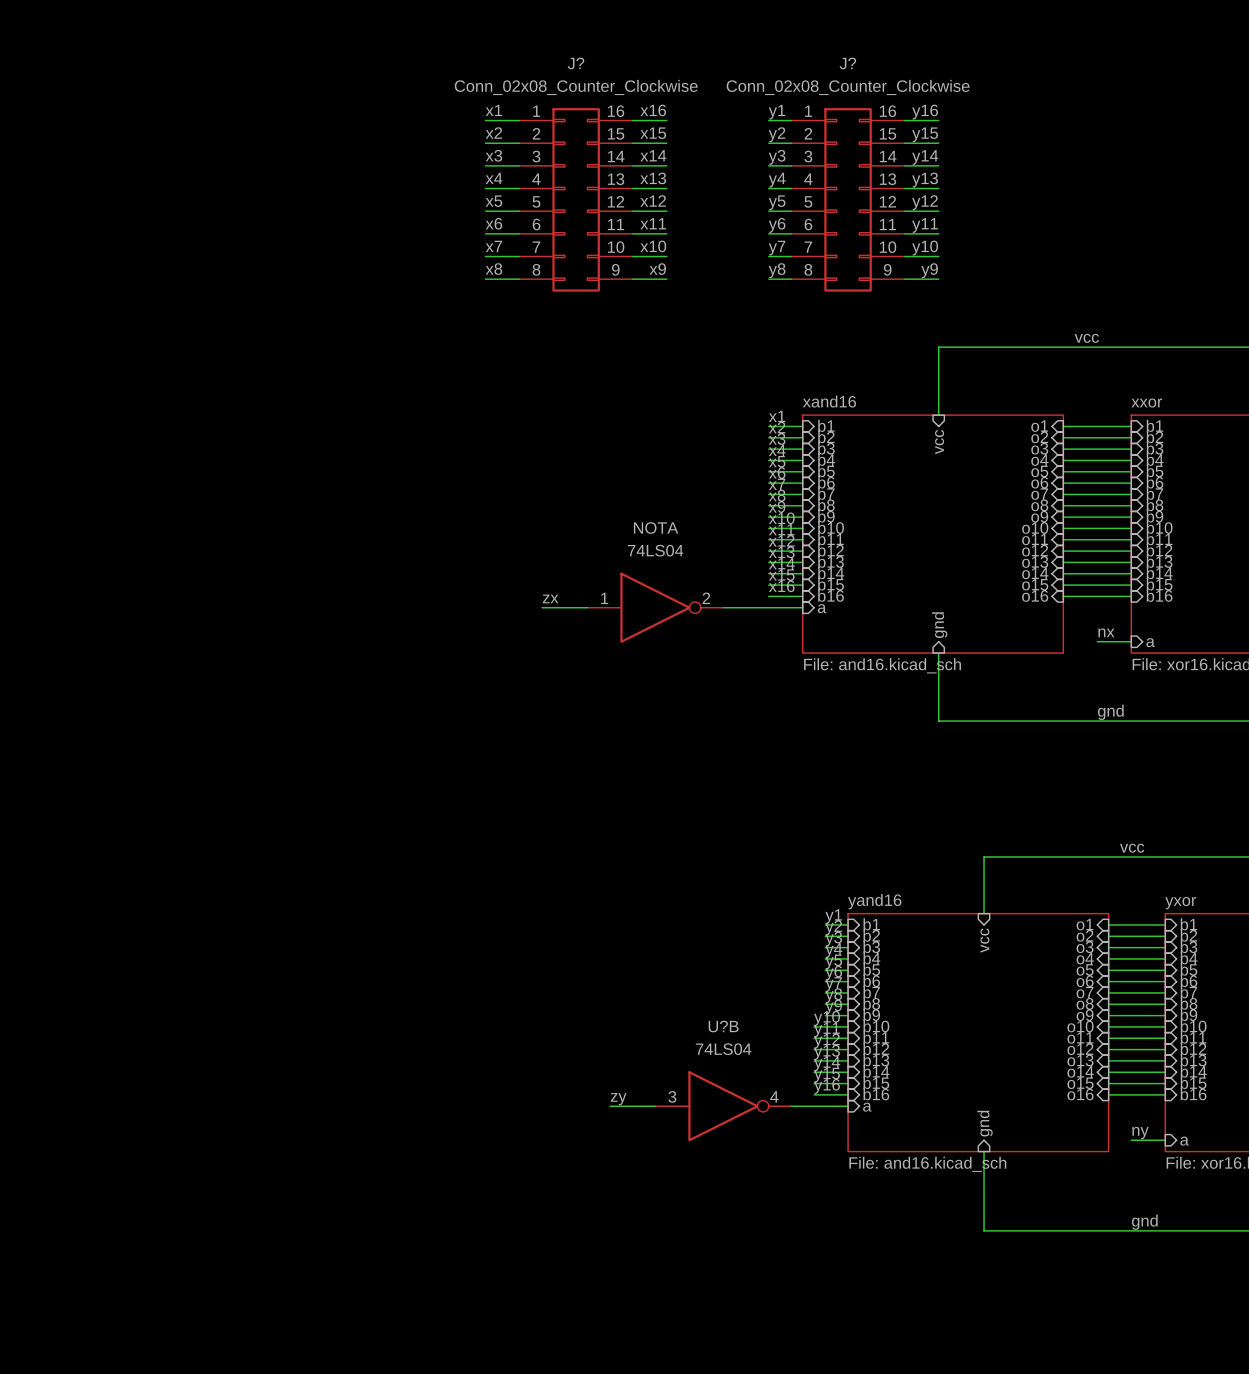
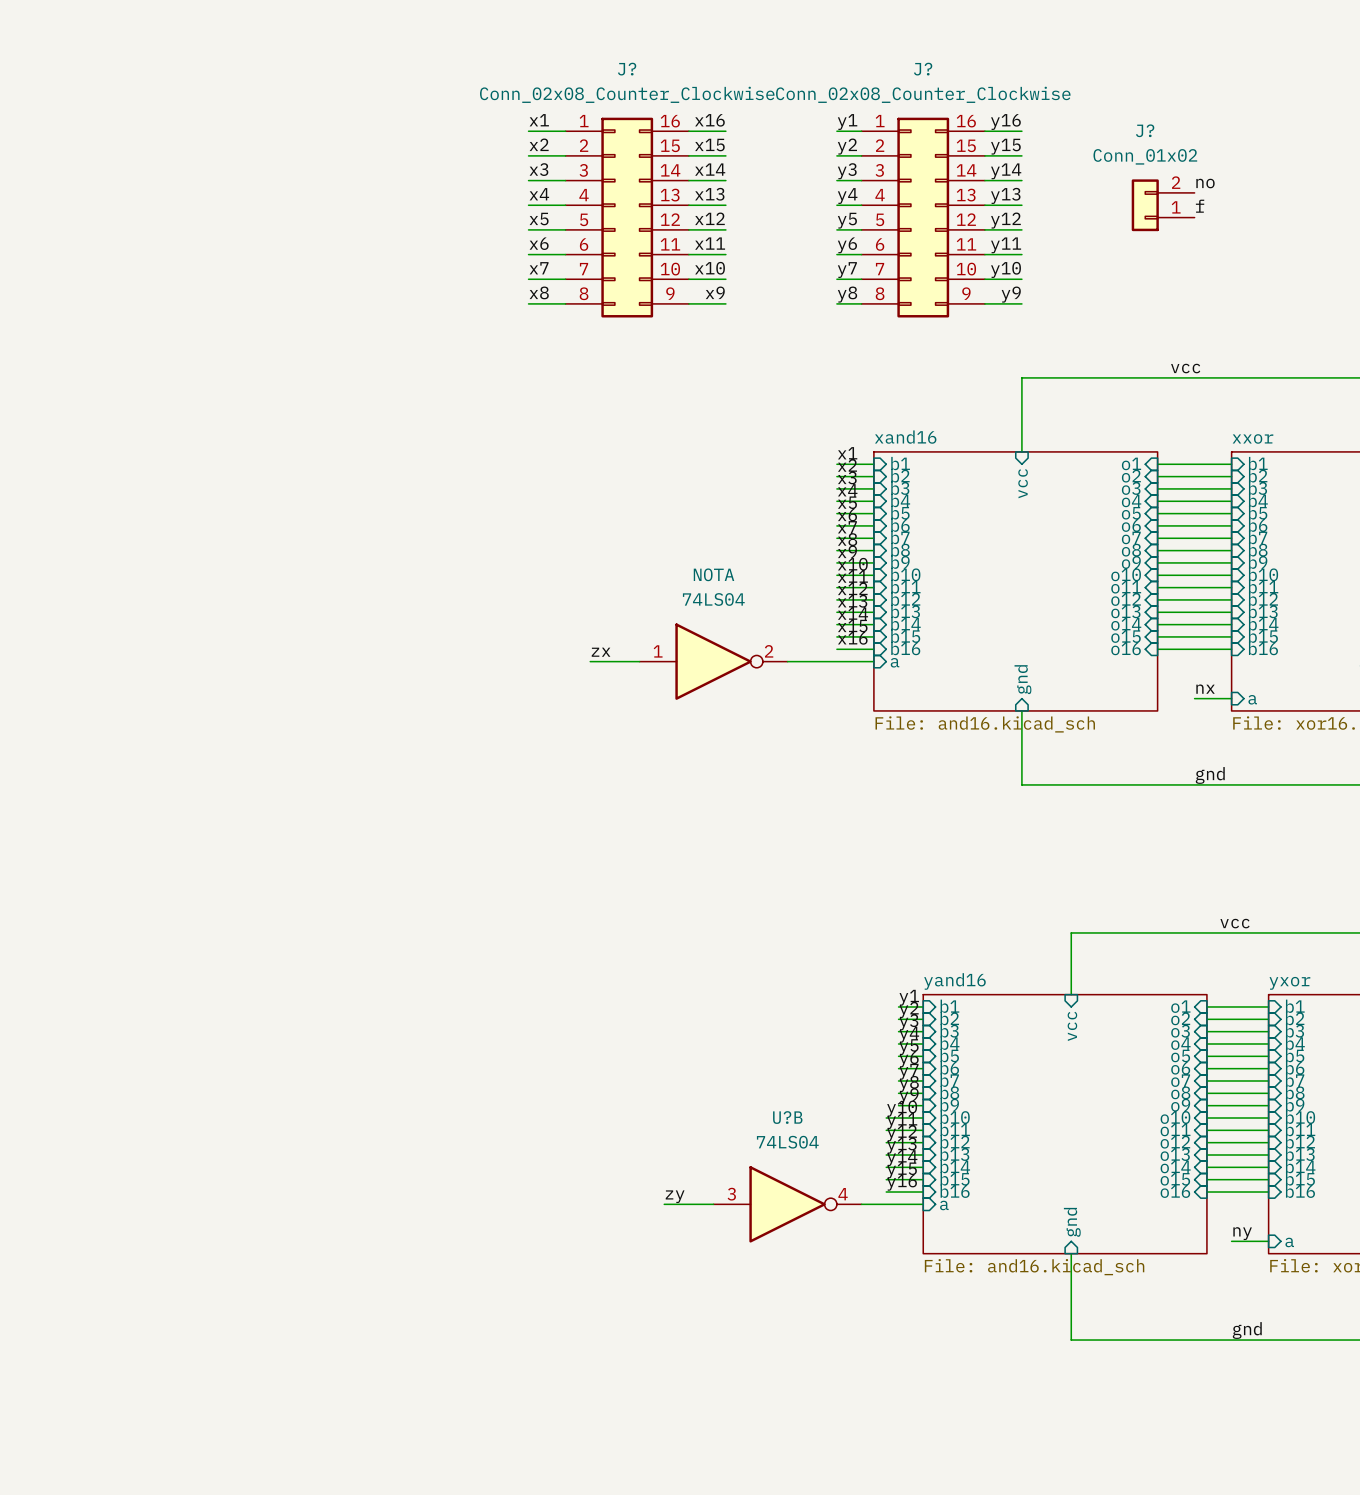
label: none -> no (1205, 183)
J?: none -> Conn_01x02 (1163, 205)
label: none -> f (1200, 206)

